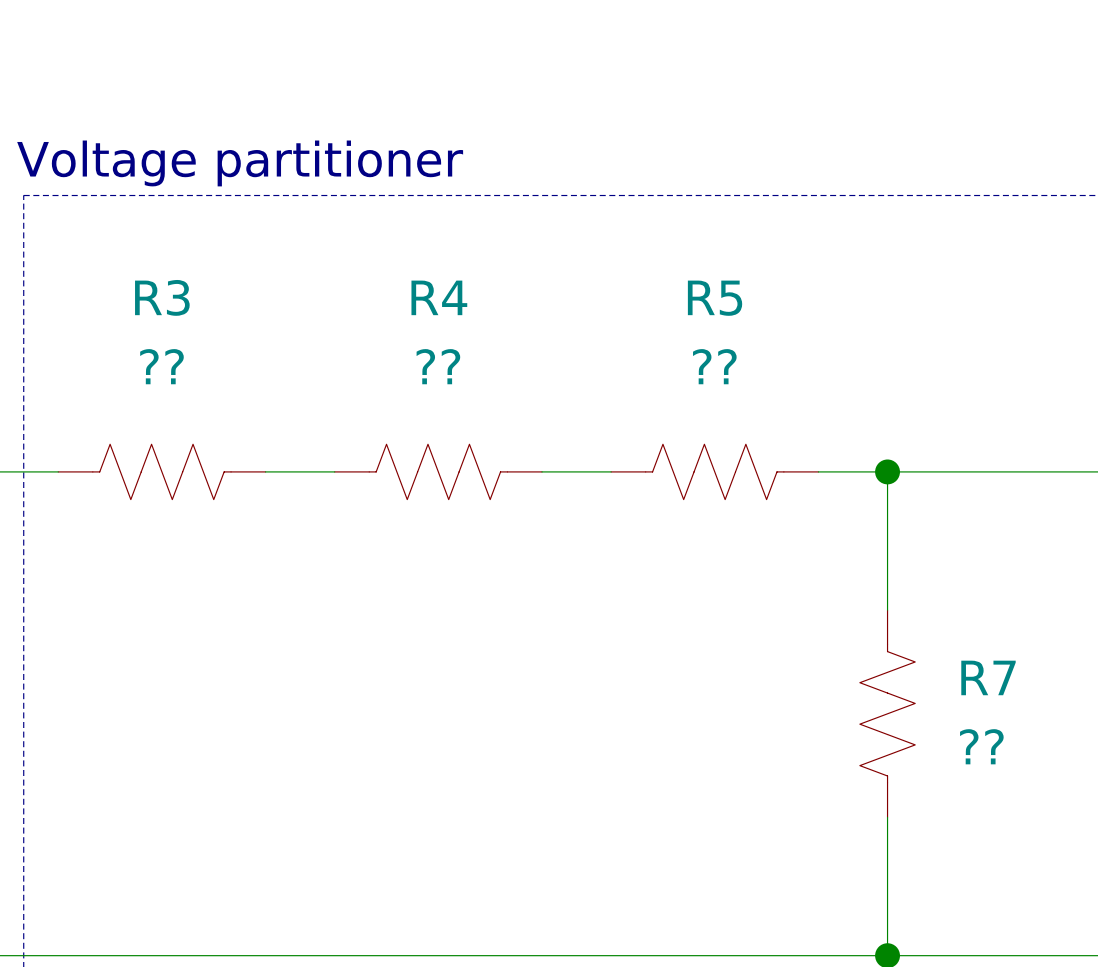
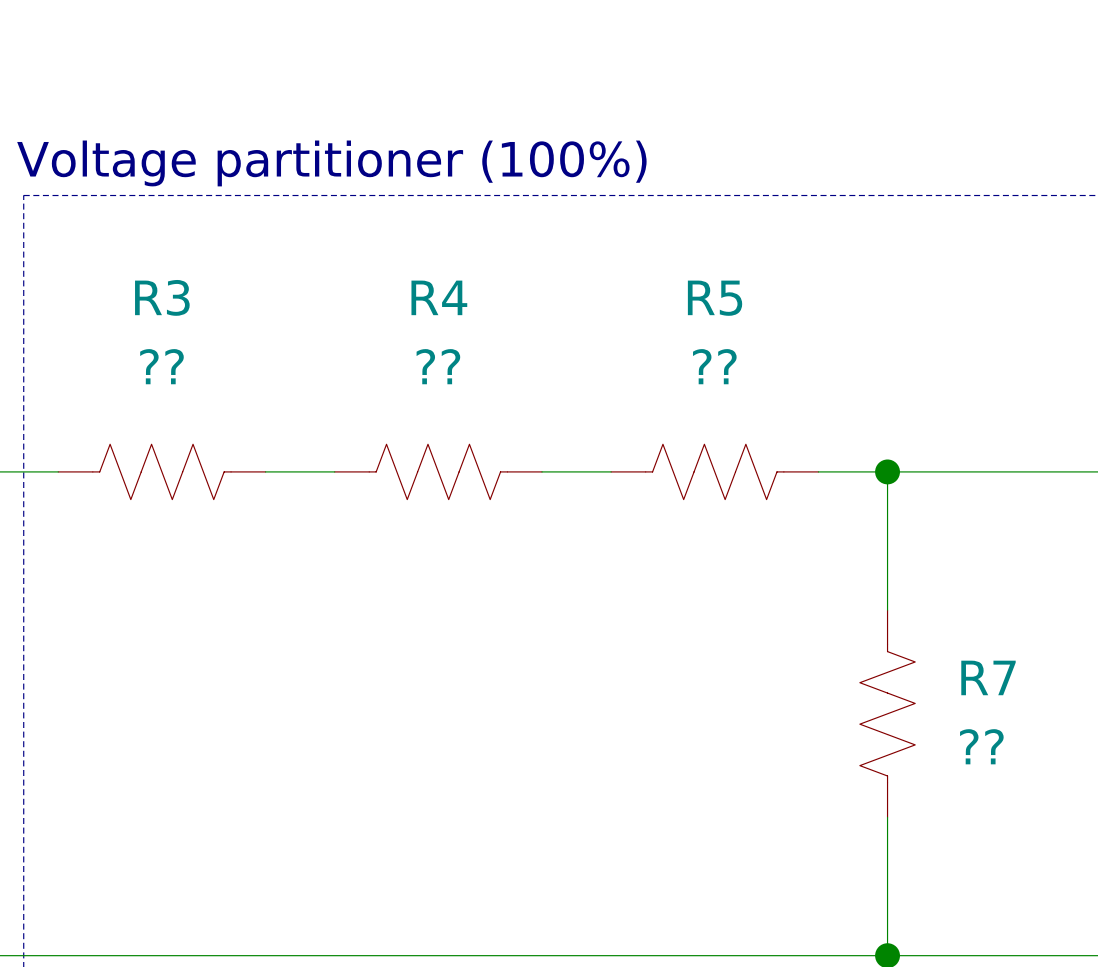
text: Voltage partitioner (240, 163) -> Voltage partitioner (100%) (331, 163)

